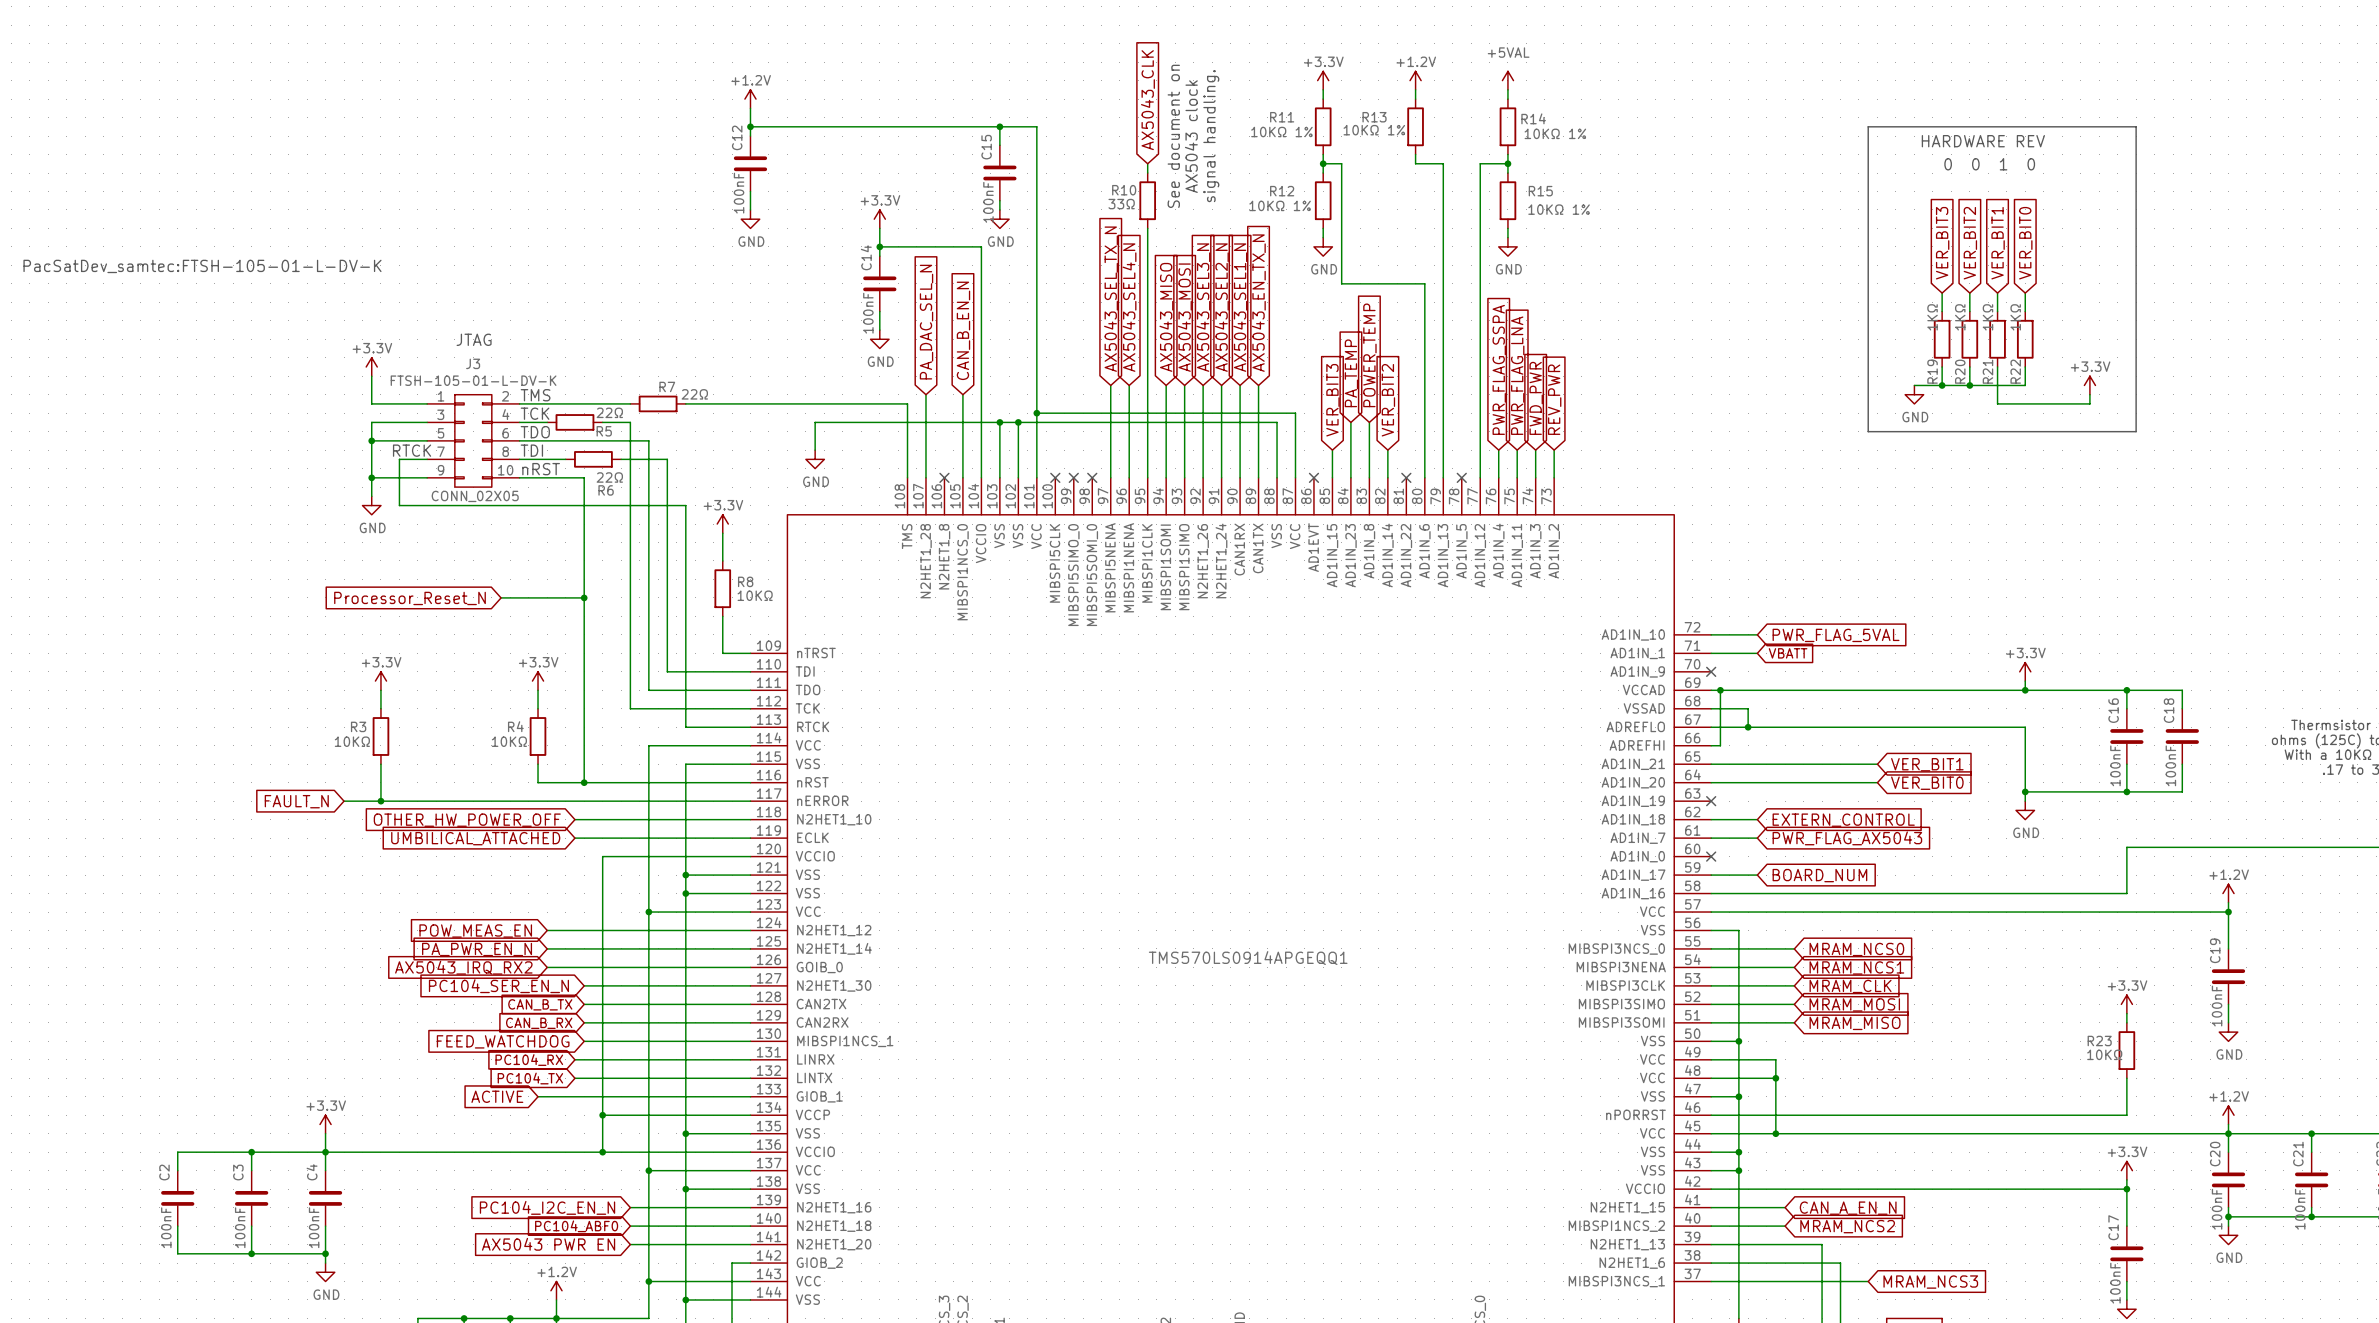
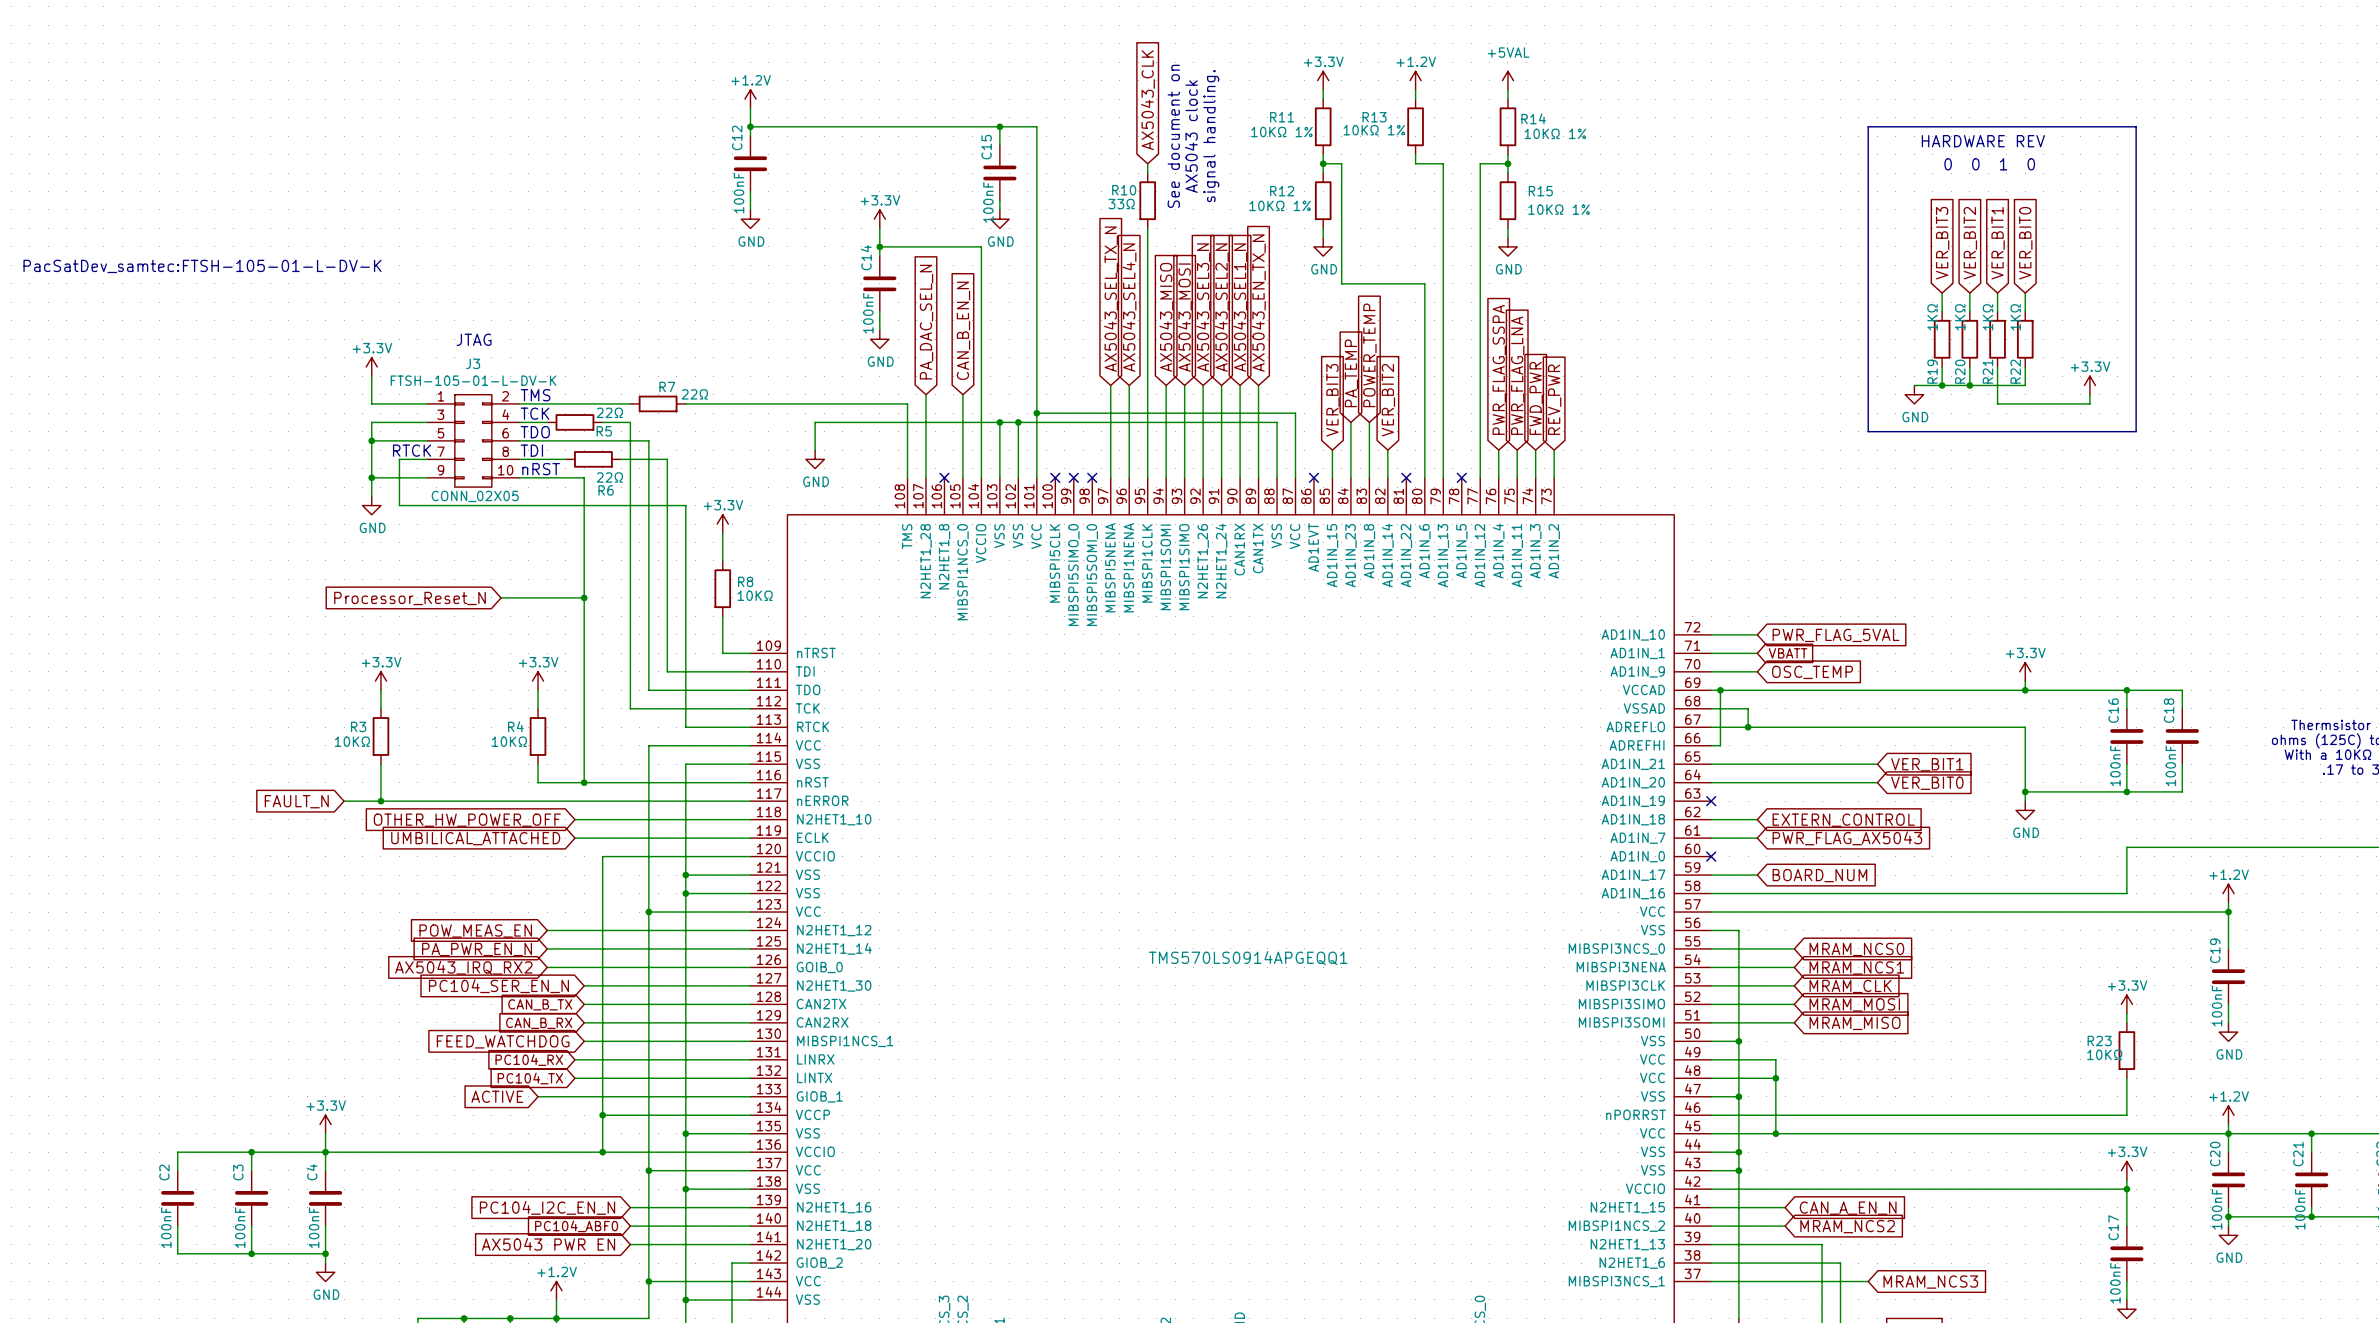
wire: none -> (1711, 671) (1757, 671)
no-connect mark: (1711, 671) -> none
global label: none -> OSC_TEMP (1812, 672)

